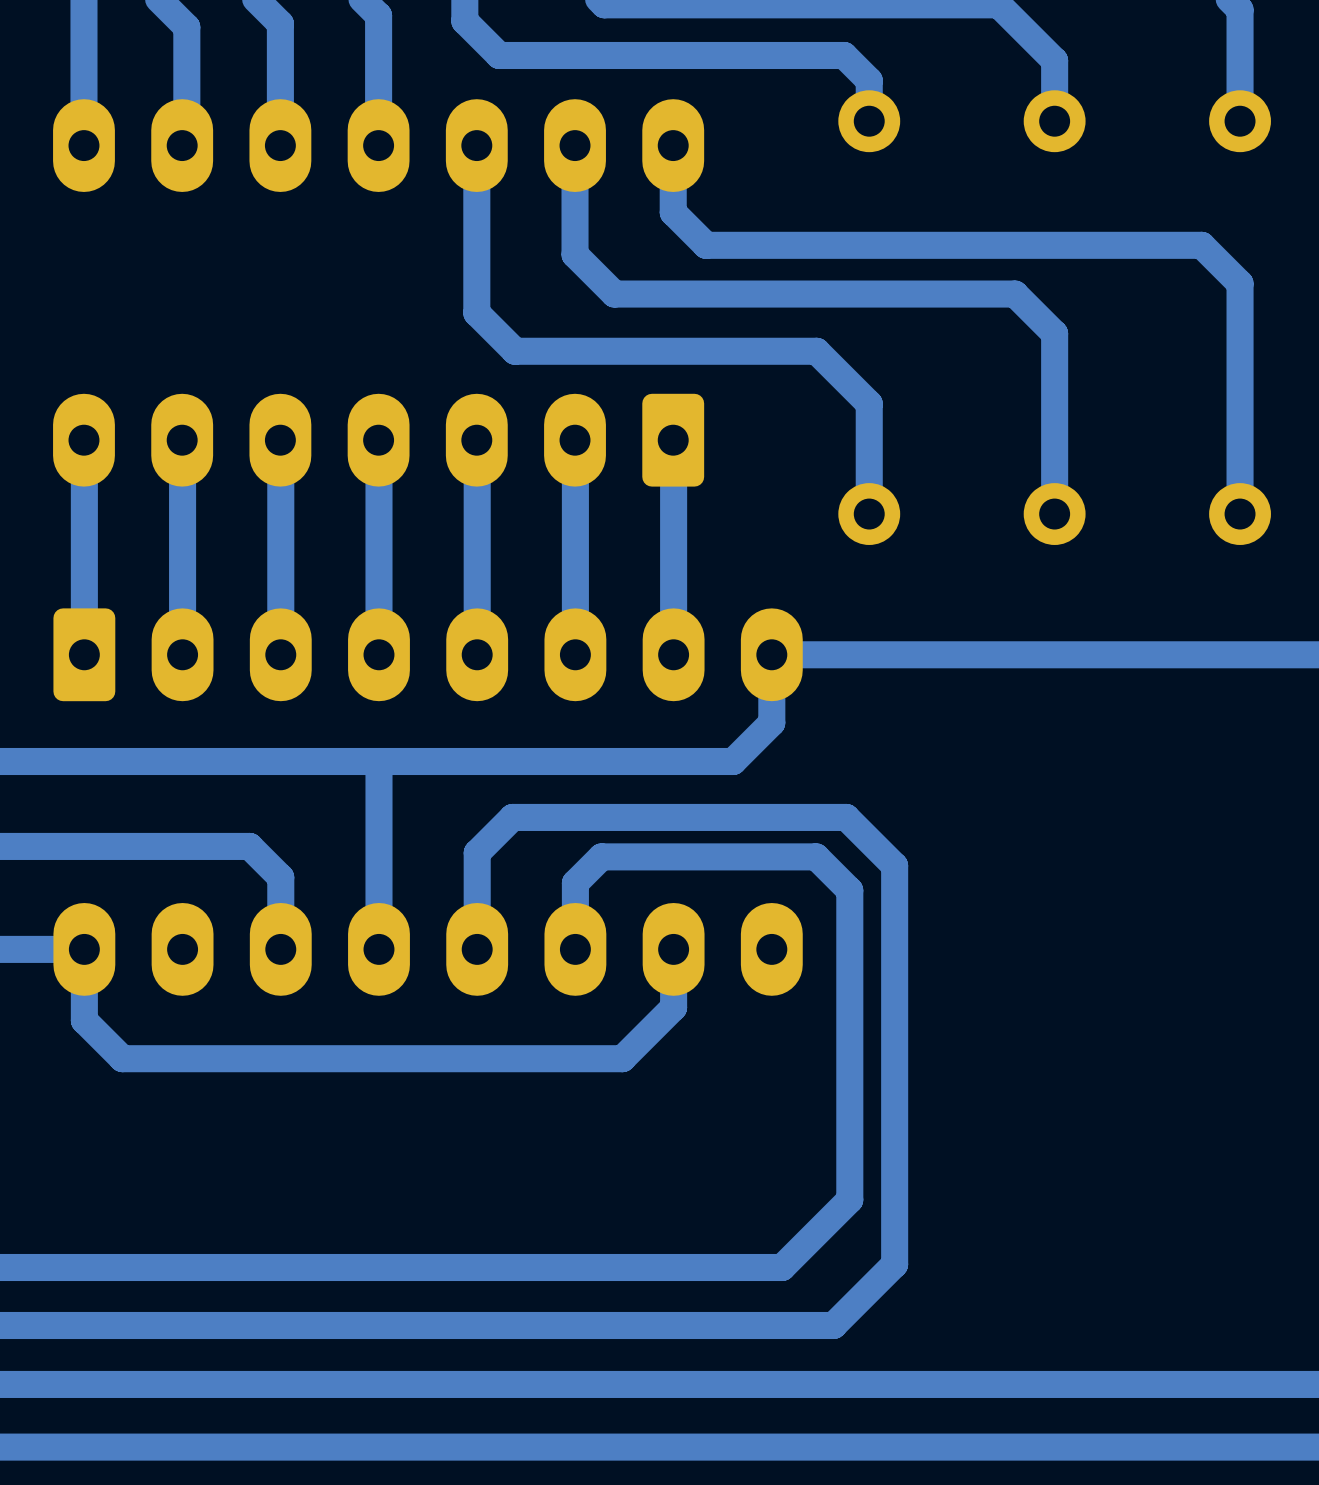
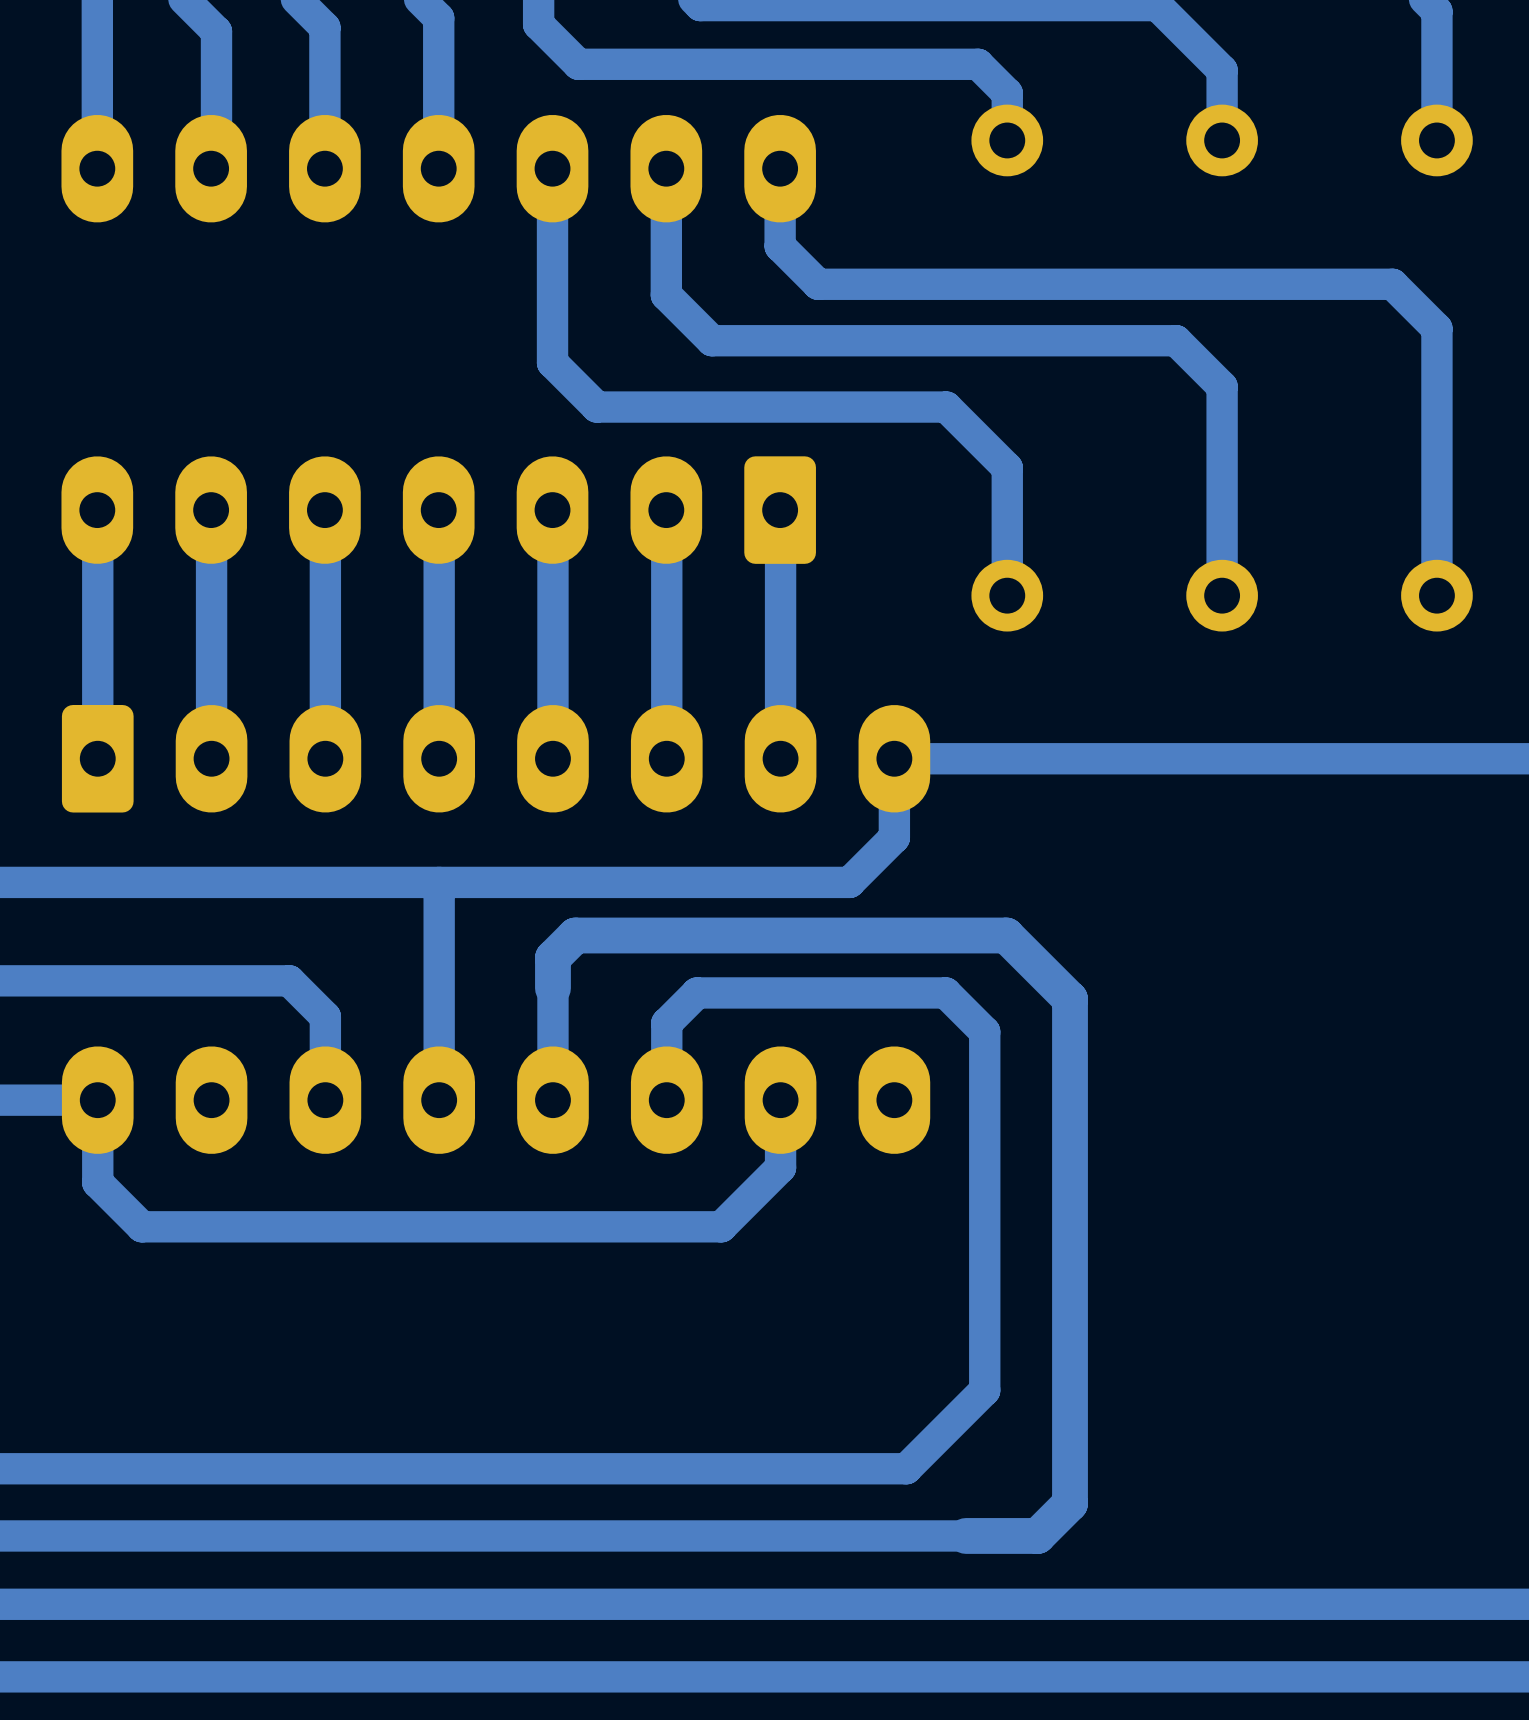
bottom track: (477, 852) (512, 817) (846, 817) (894, 865) (894, 1264) (833, 1325) -> (552, 988) (552, 957) (575, 935) (1006, 935) (1070, 999) (1070, 1503) (1037, 1535) (965, 1535)

